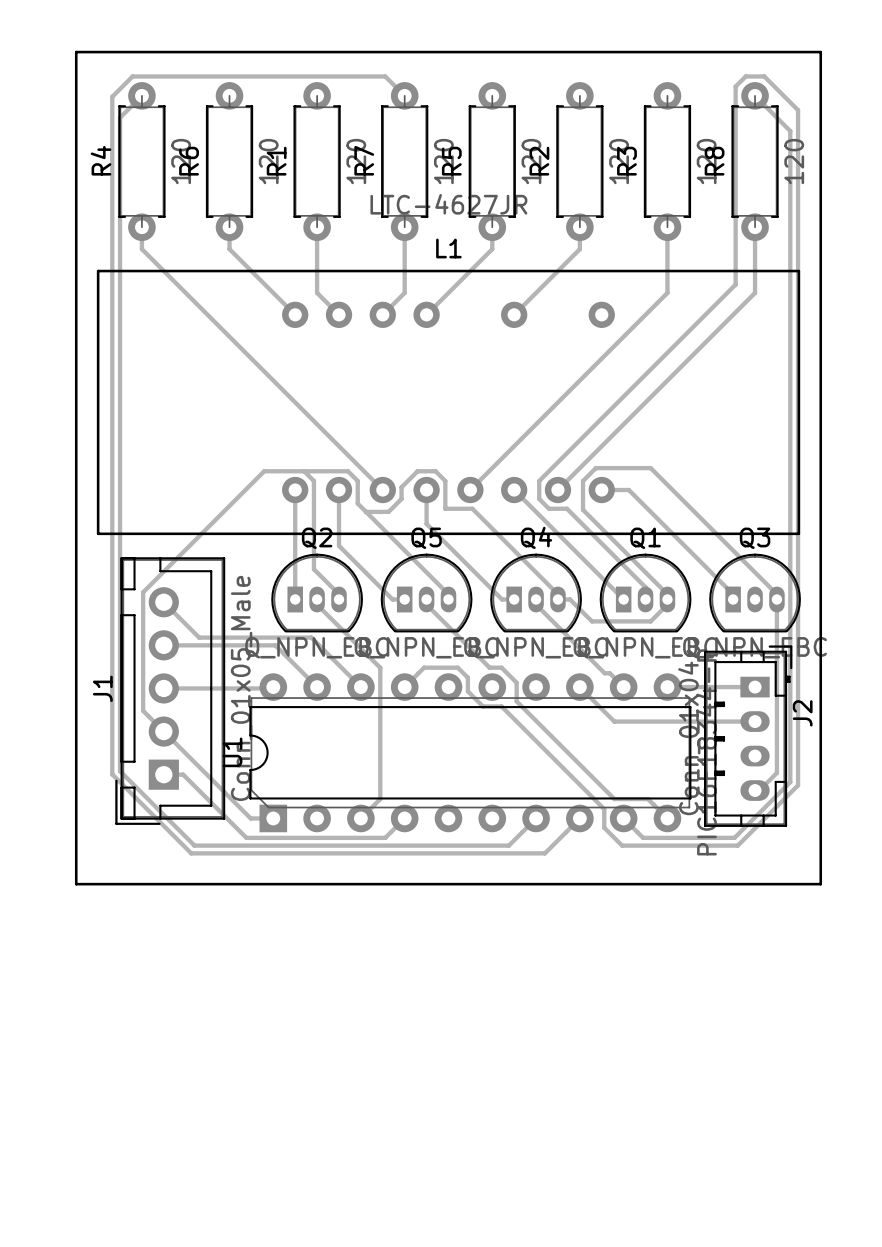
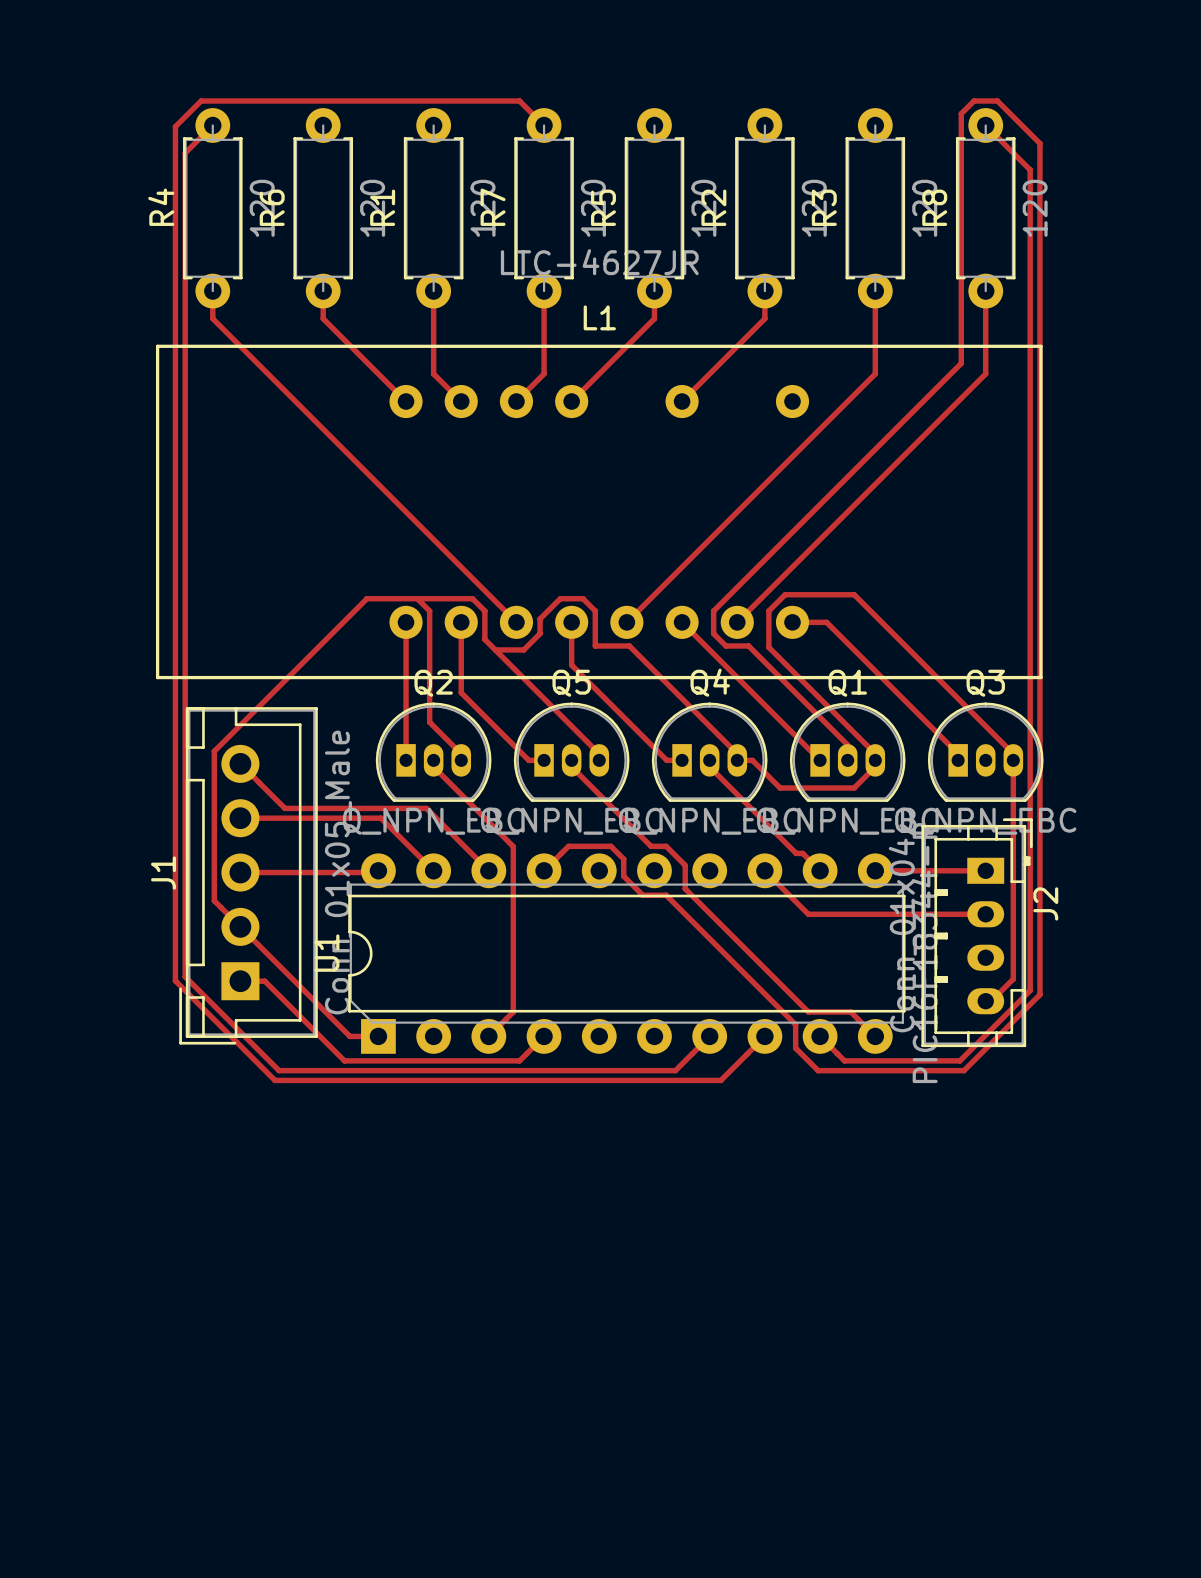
board edge: (76, 52) (76, 884) (820, 884) (820, 52) (76, 52) -> none

